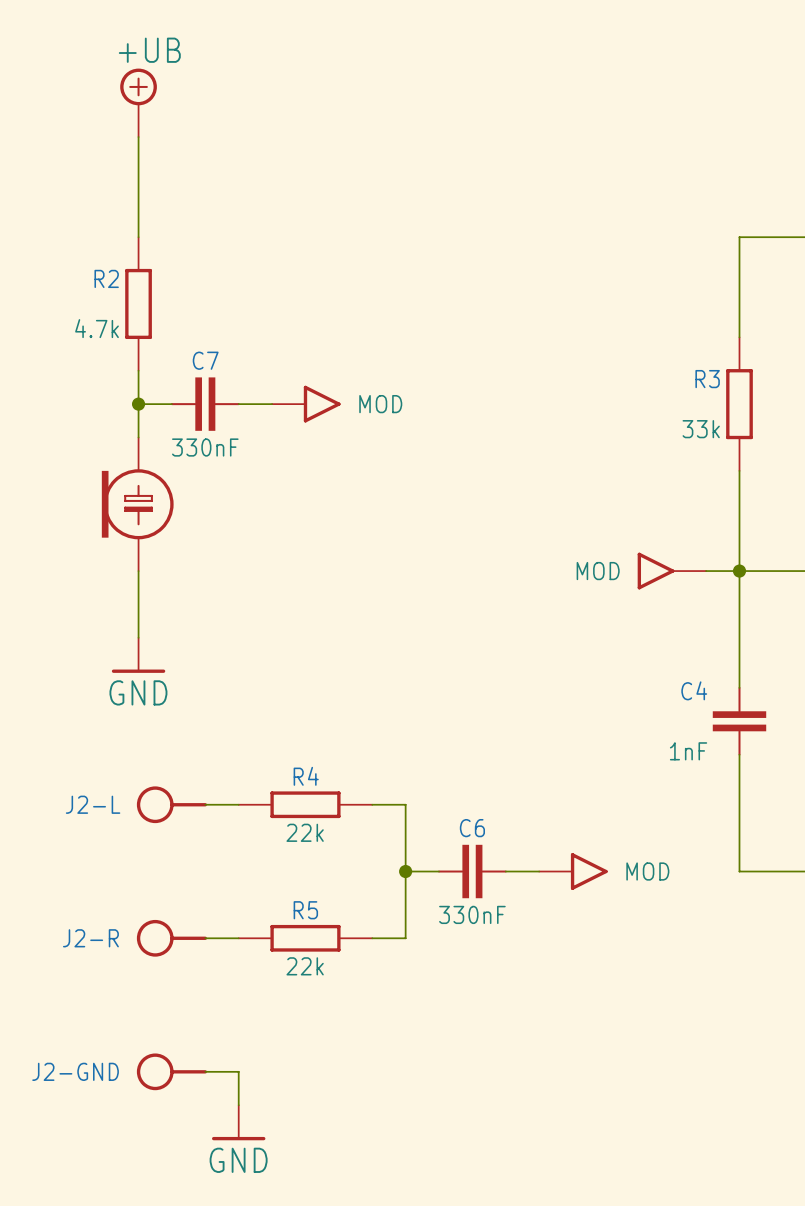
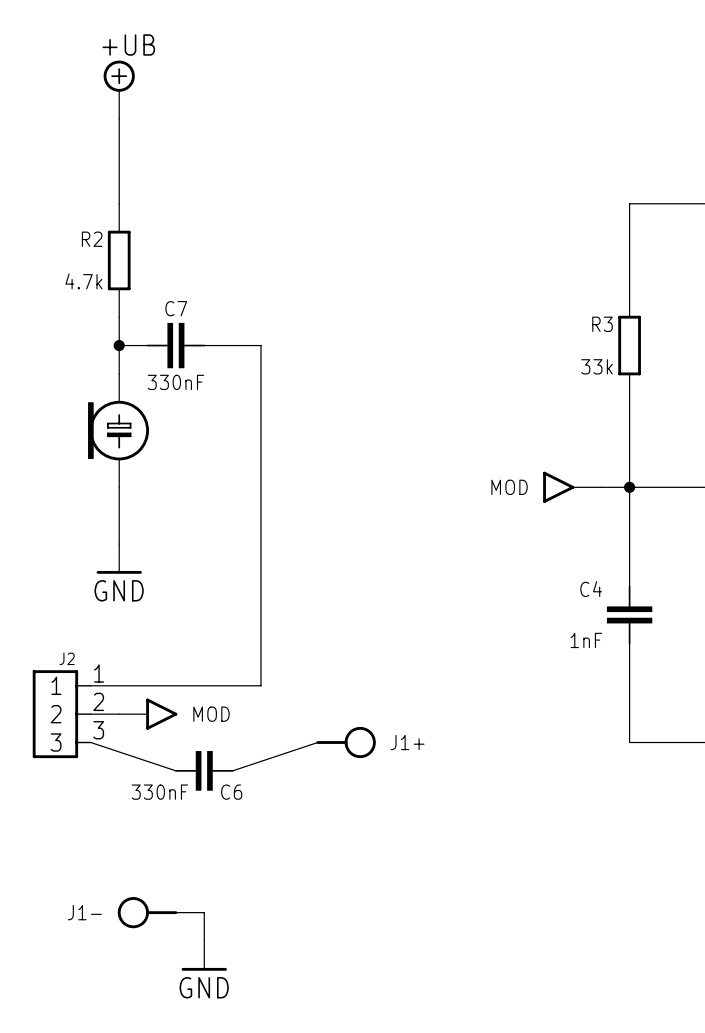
wire: none -> (232, 345) (260, 345) (260, 685) (204, 685)
power symbol: MOD (306, 404) -> none
wire: none -> (90, 685) (175, 685)
J2-L: (171, 804) -> none
R4: 22k (305, 804) -> none
wire: (372, 804) (405, 804) (405, 938) (372, 938) -> none
C6 name position: C6 (472, 828) -> C6 (231, 792)
J2: none -> (62, 714)
power symbol: none -> MOD (148, 714)
C6 symbol: [438, 844, 507, 899] -> [175, 751, 234, 791]
wire: none -> (90, 742) (175, 770)
wire: none -> (317, 742) (232, 770)
wire: (405, 871) (439, 871) -> none
J1+: none -> (346, 742)
junction: (405, 871) -> none
wire: (505, 871) (539, 871) -> none
power symbol: MOD (573, 871) -> none
C6 value position: 330nF (472, 914) -> 330nF (159, 792)
J2-R: (171, 938) -> none
wire: (205, 938) (238, 938) -> (90, 714) (119, 714)
R5: 22k (305, 938) -> none
J2-GND name: J2-GND (75, 1071) -> J1- (84, 912)

